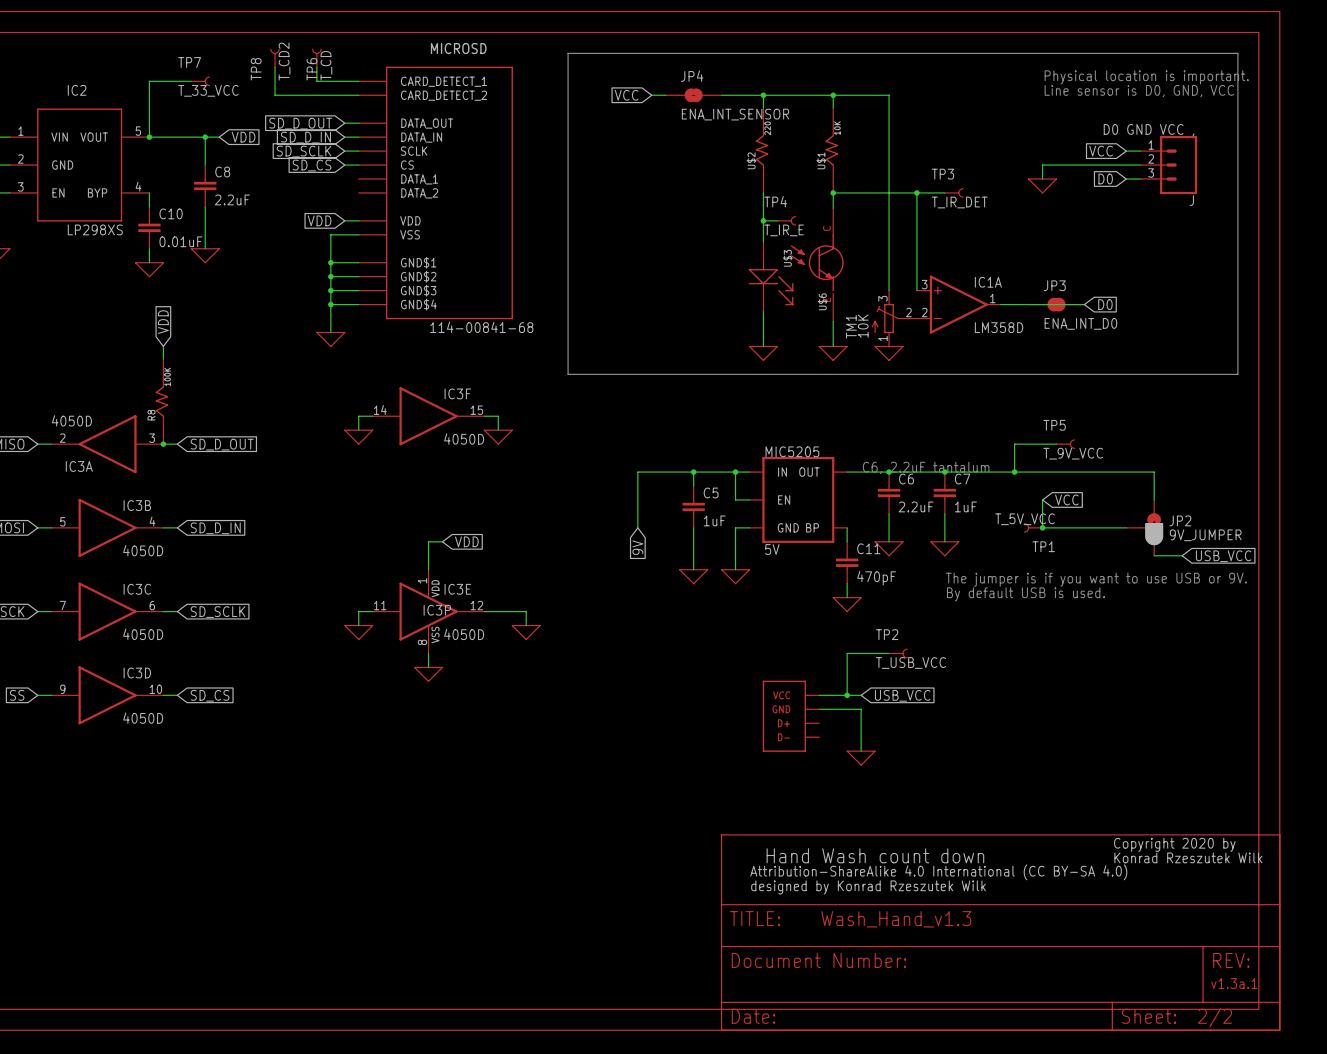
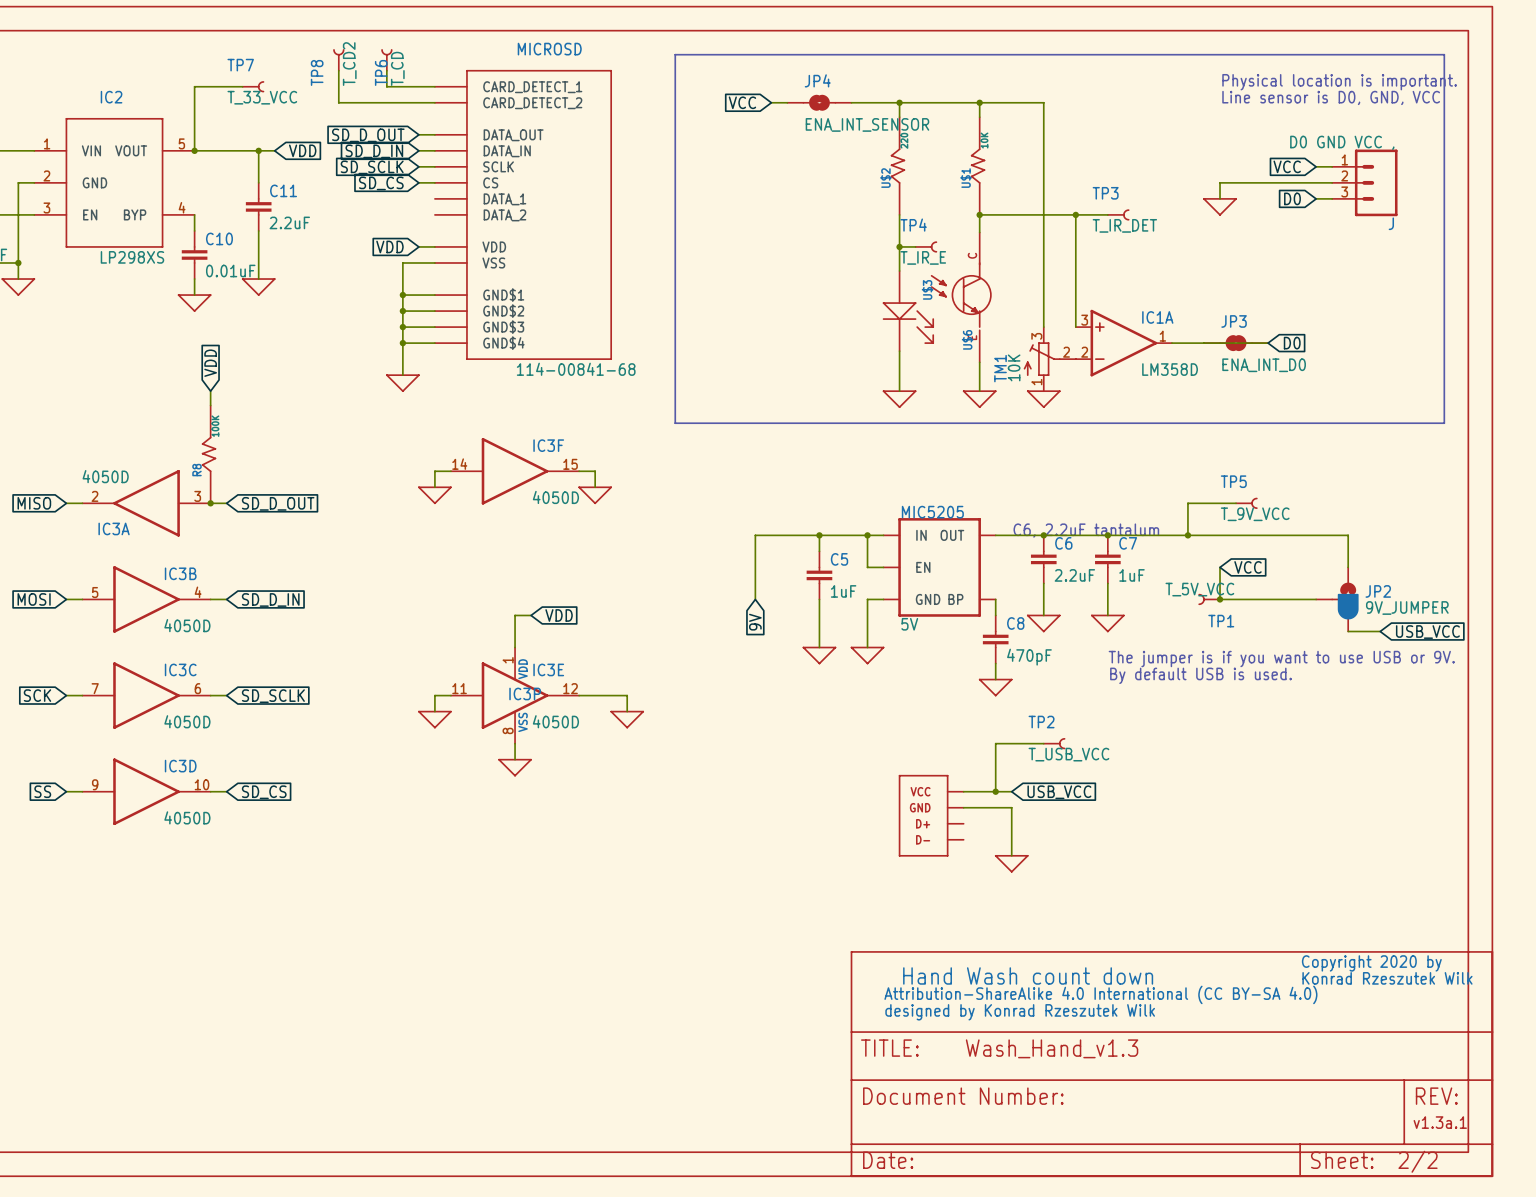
C8 name: C8 (222, 172) -> C11 (283, 190)
C11 name: C11 (868, 548) -> C8 (1015, 623)

